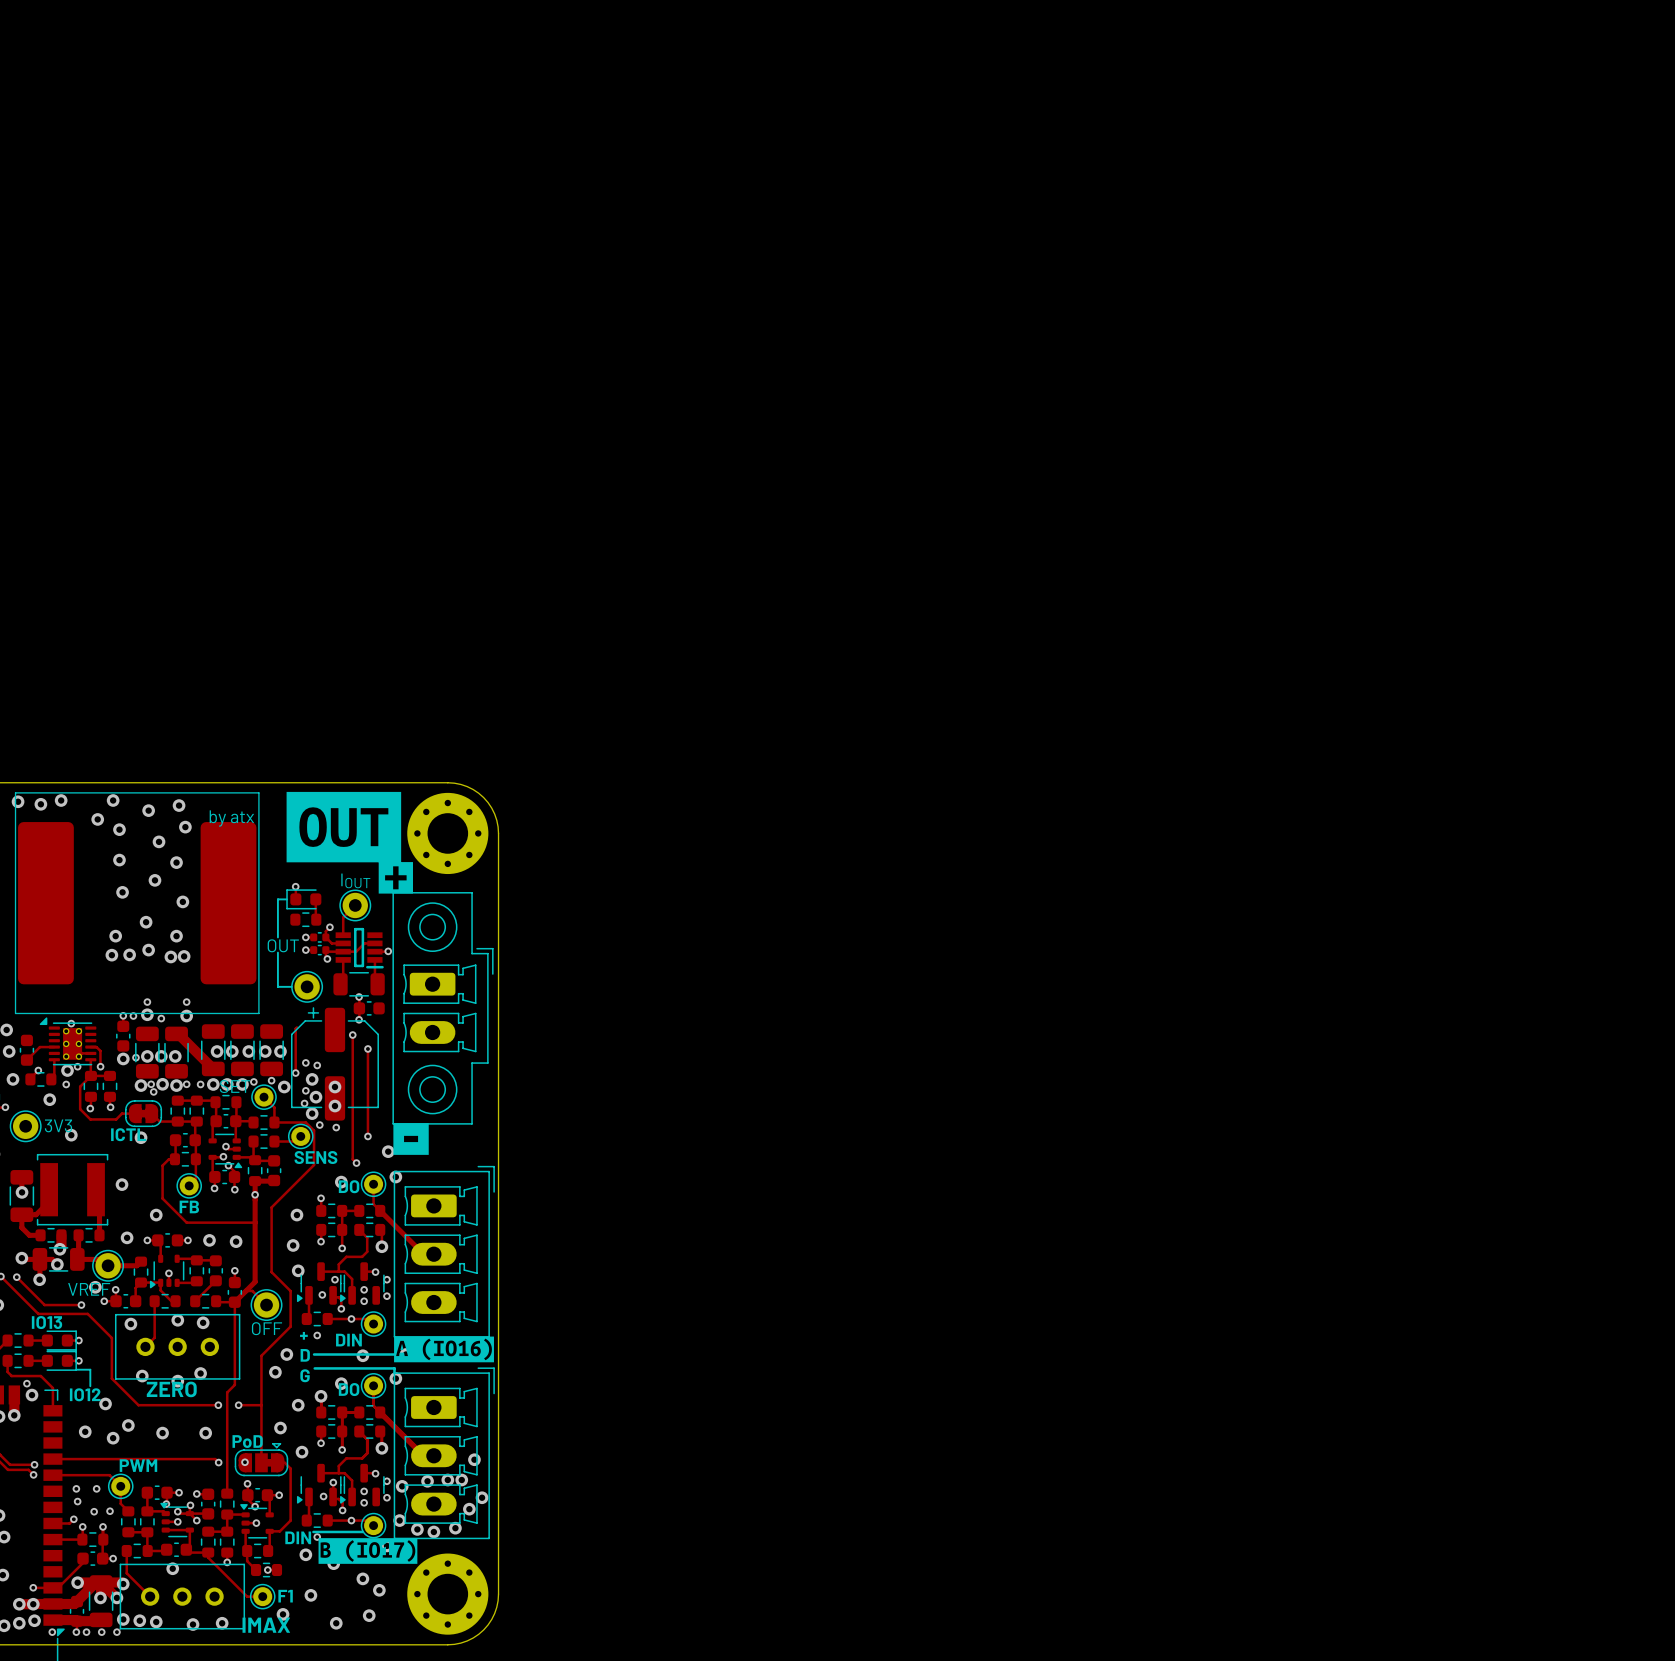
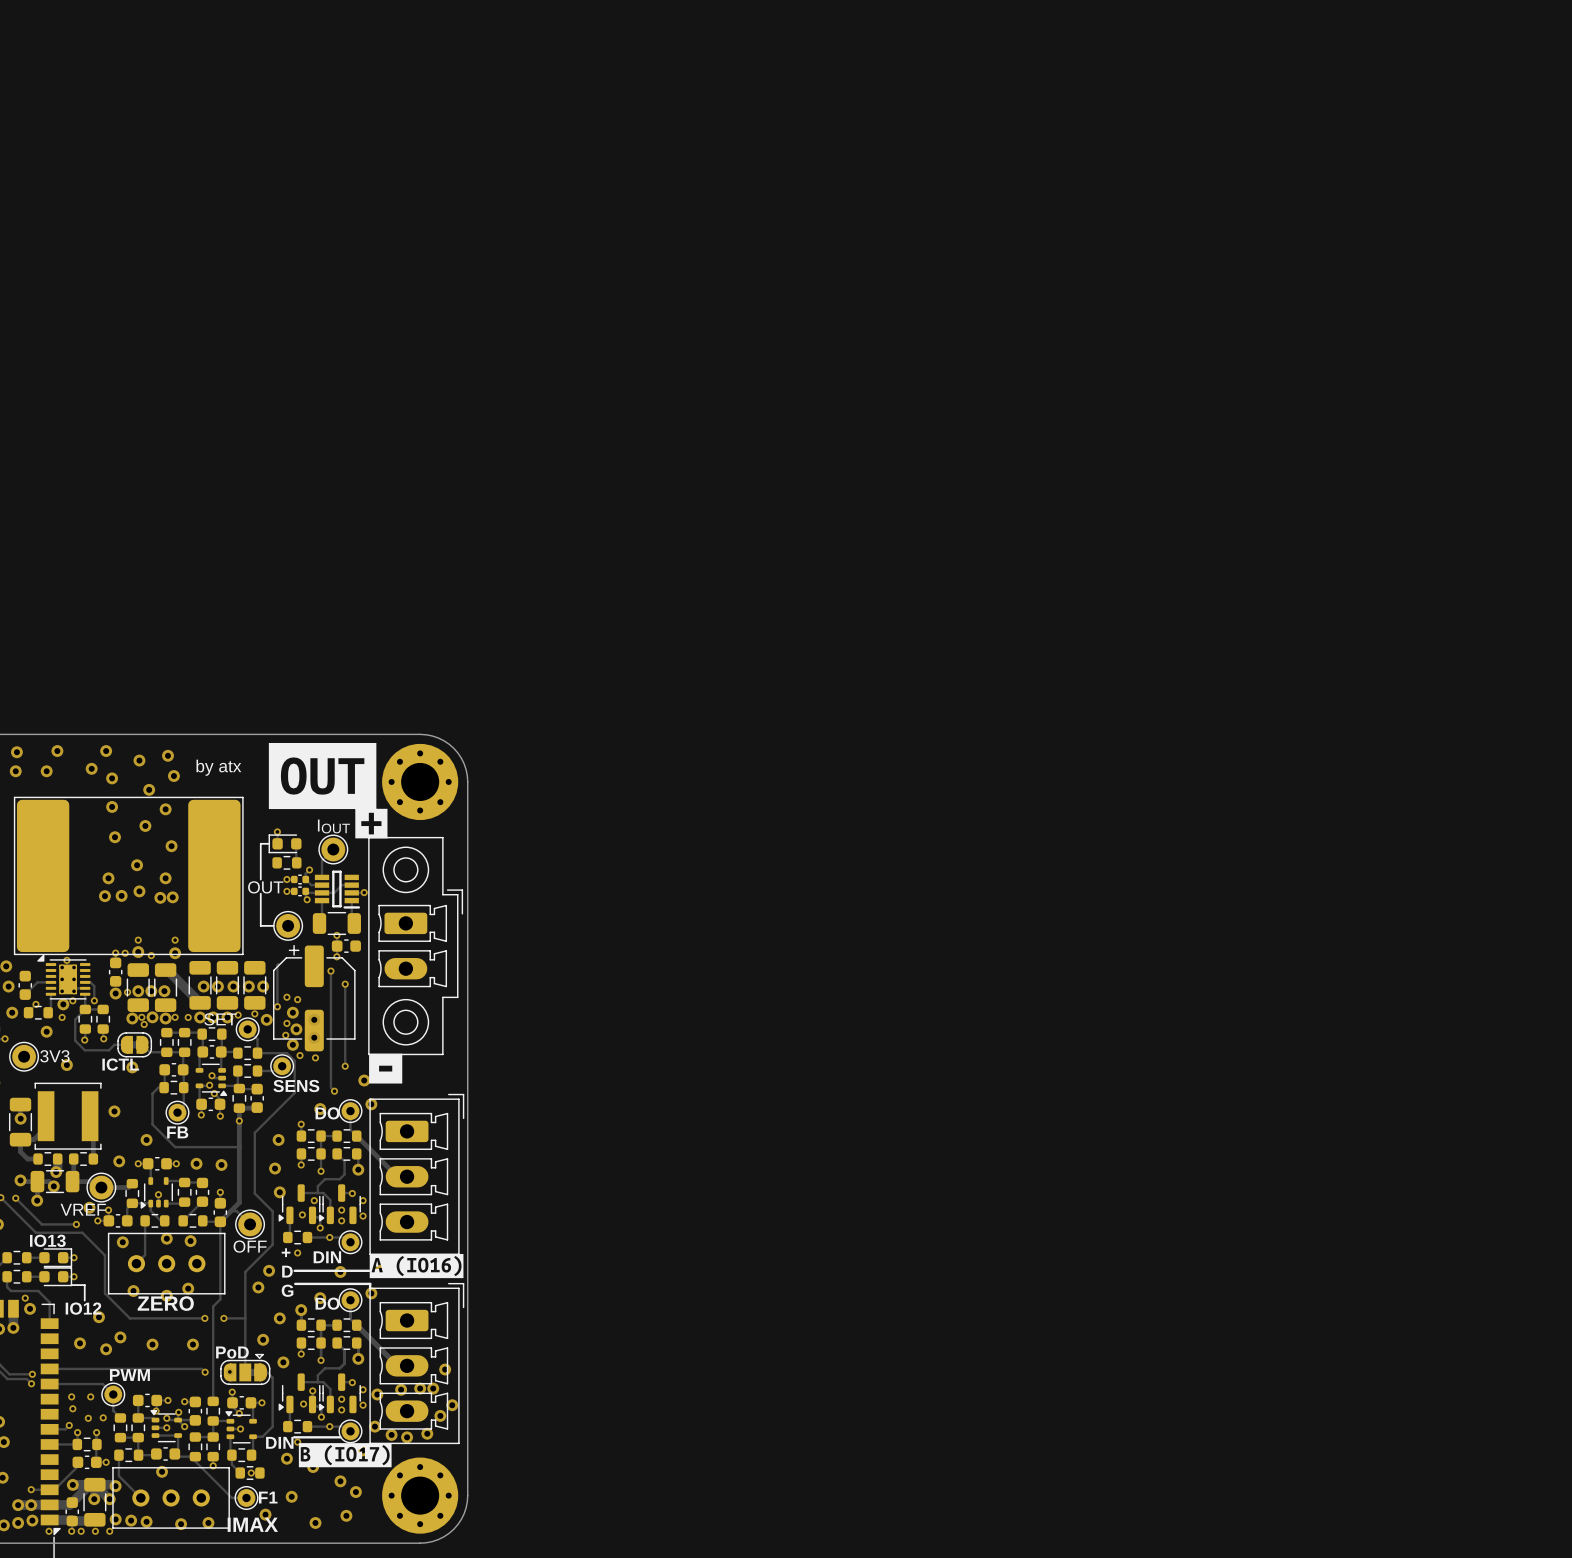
via: (40, 804) -> none
via: none -> (15, 771)
via: none -> (46, 771)
part: (137, 903) -> none
part: none -> (128, 875)

